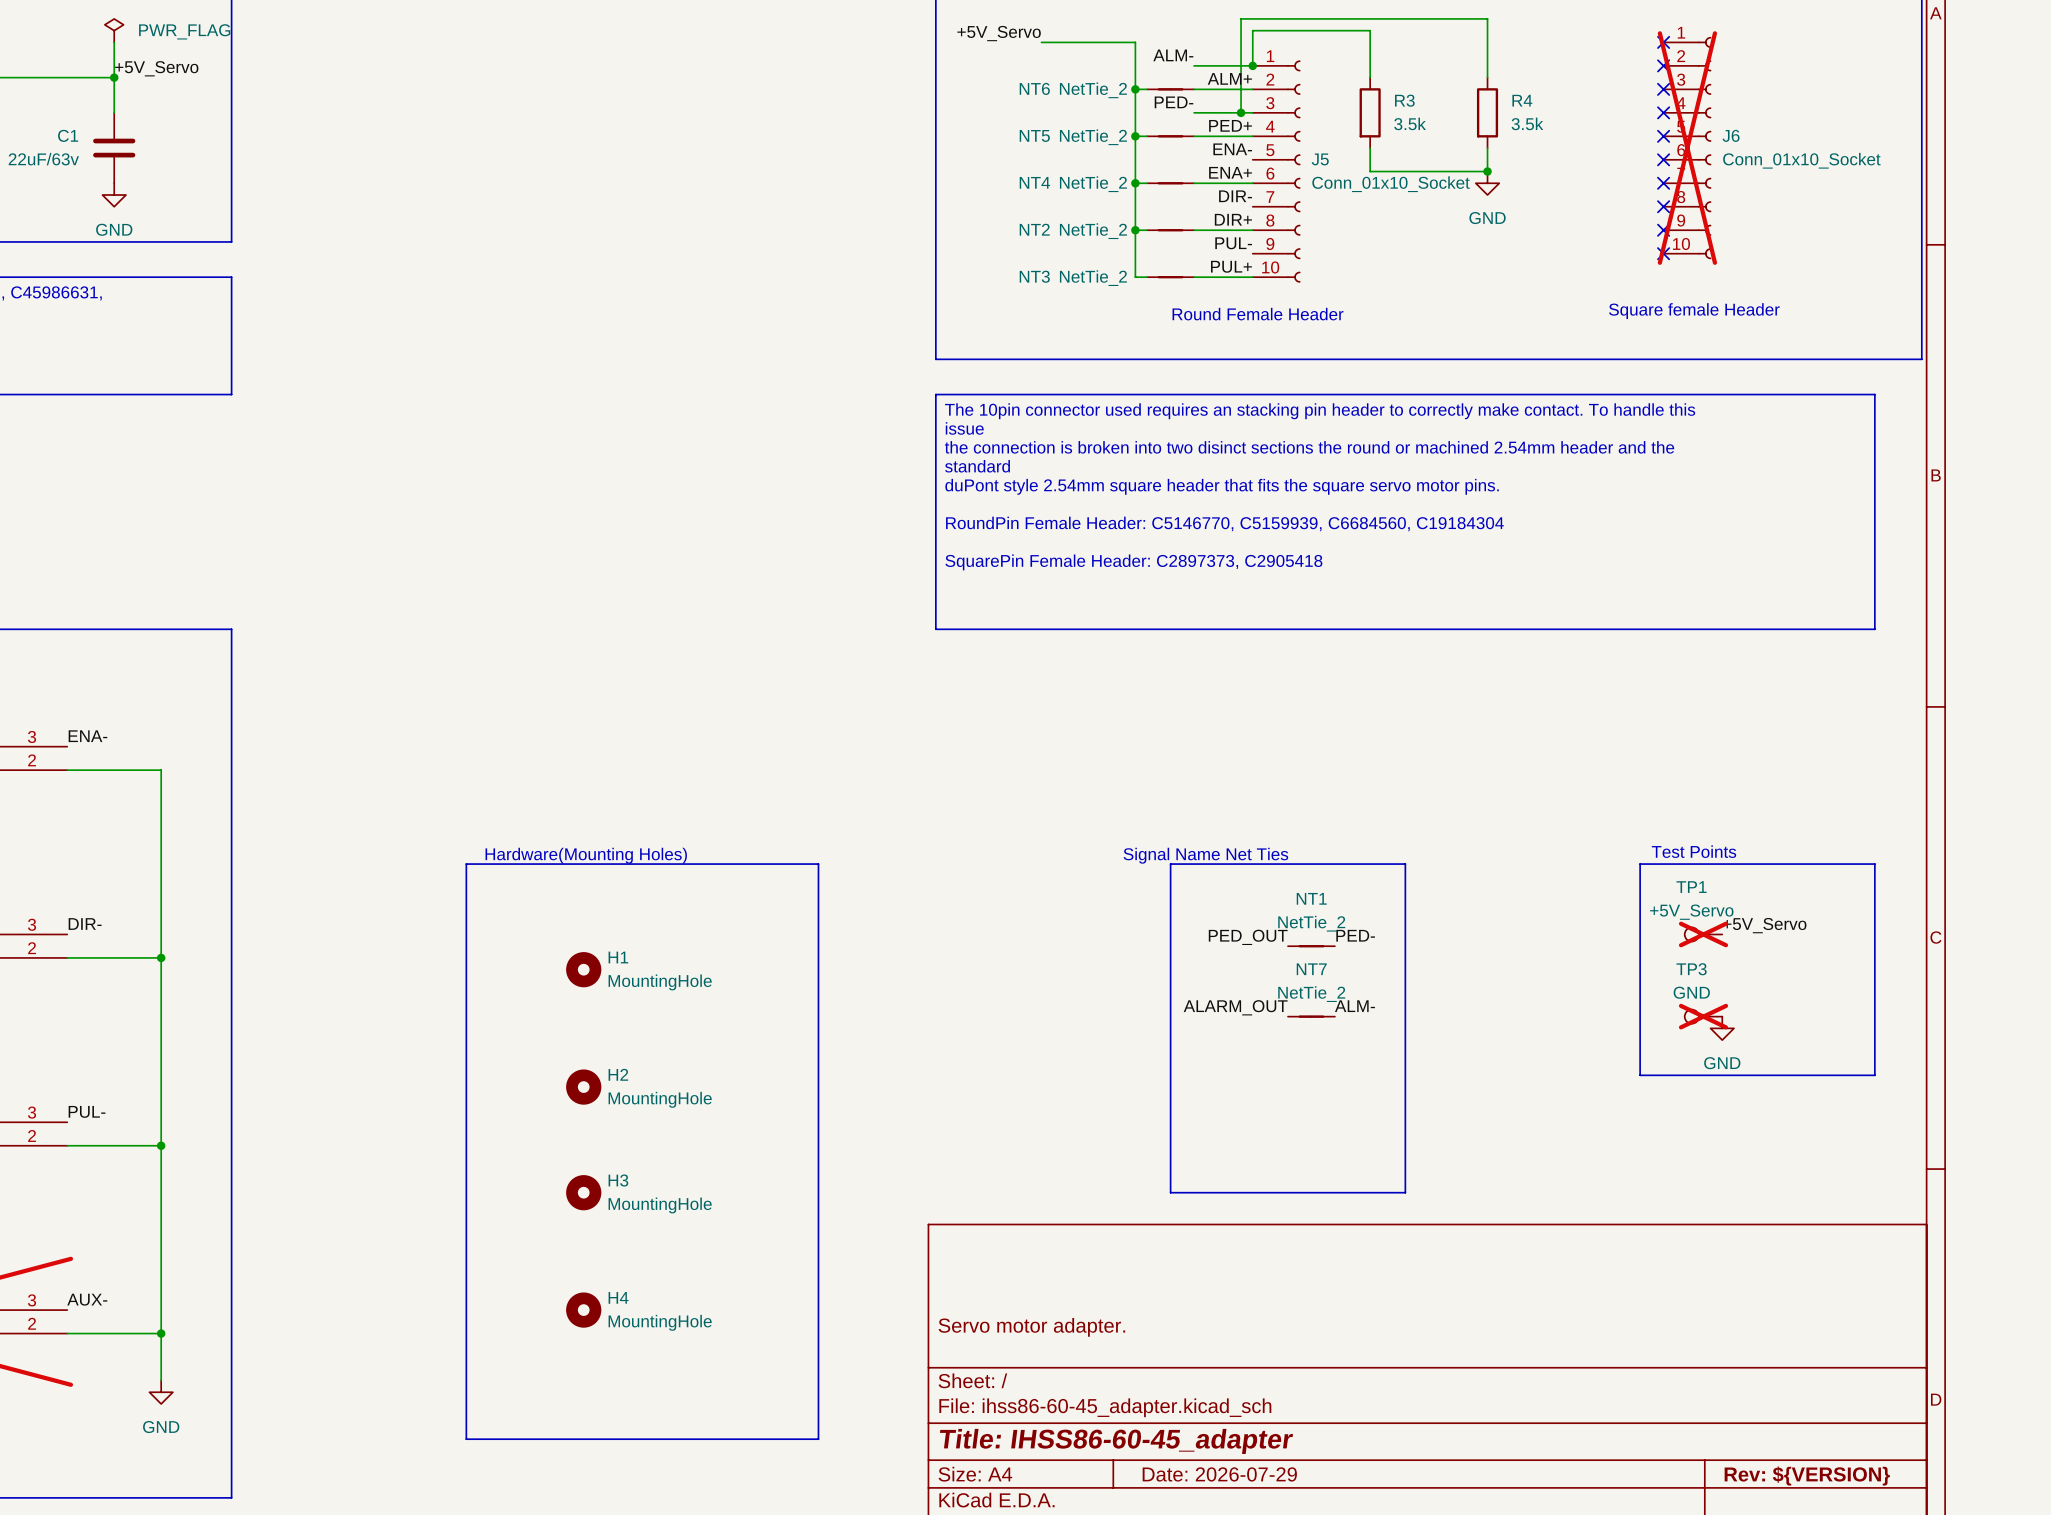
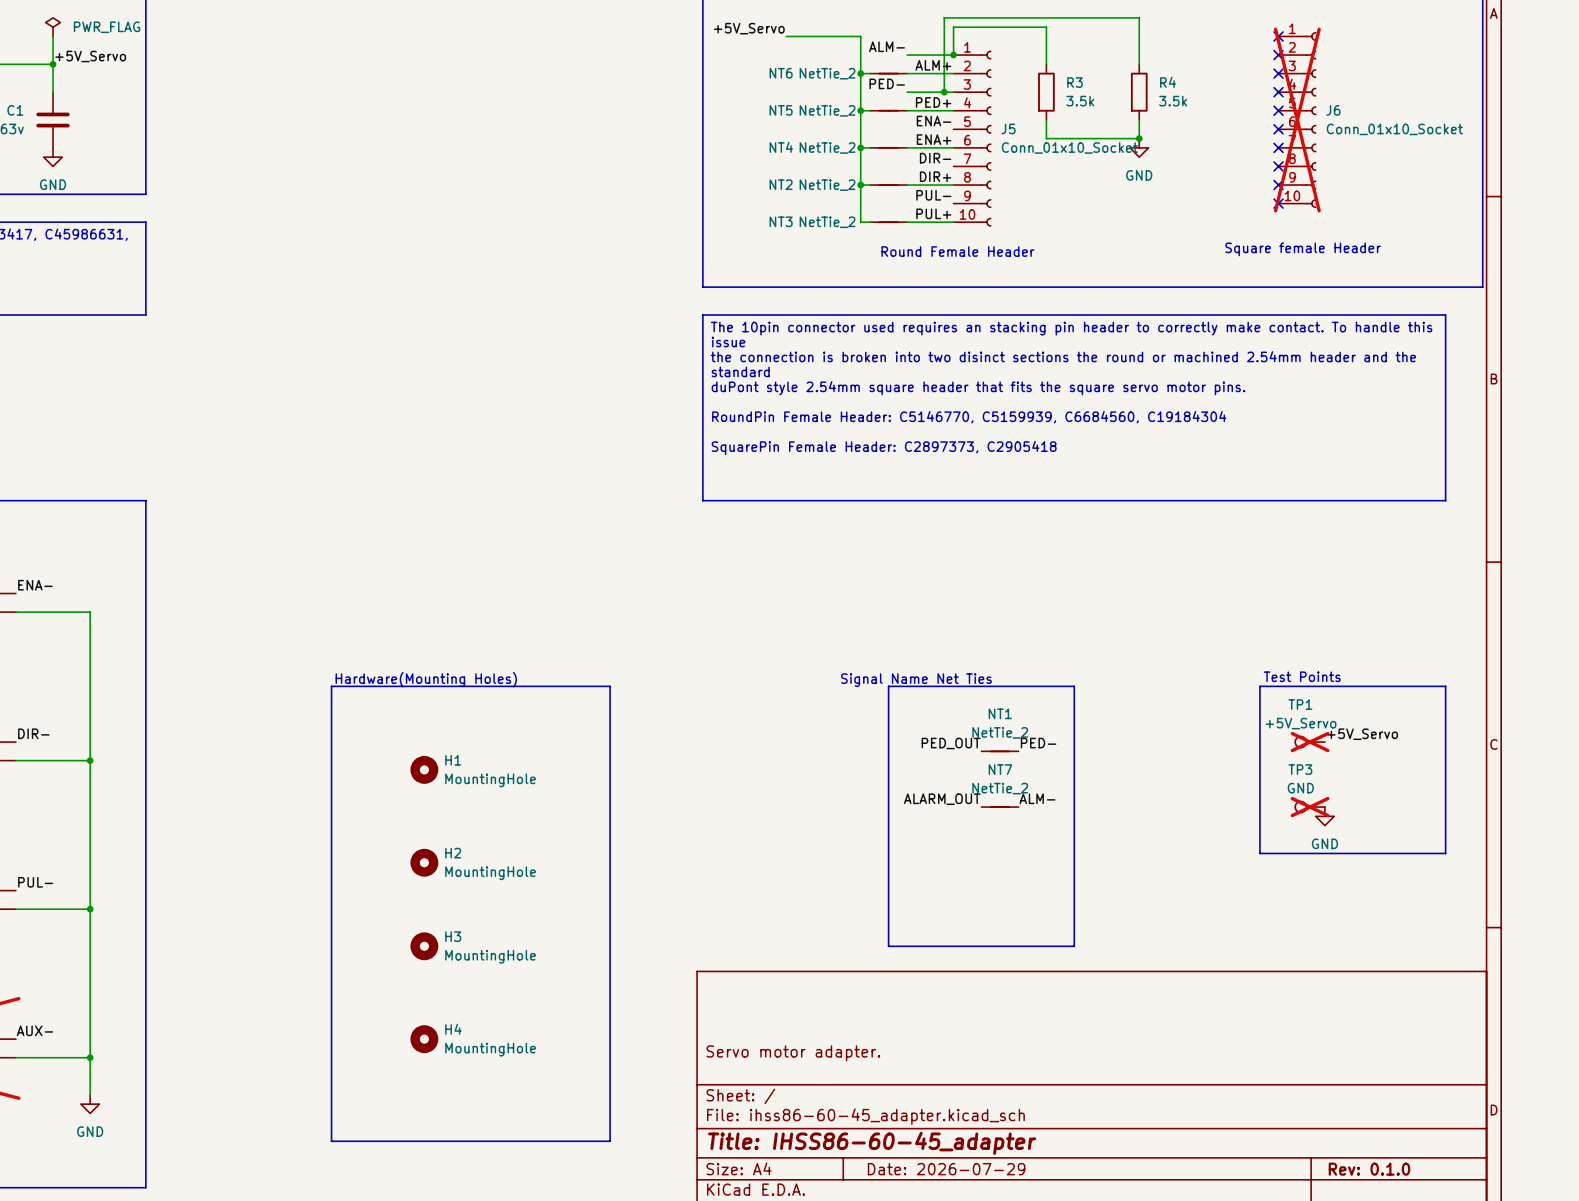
title block: Rev: ${VERSION} (1807, 1475) -> Rev: 0.1.0 (1369, 1169)

